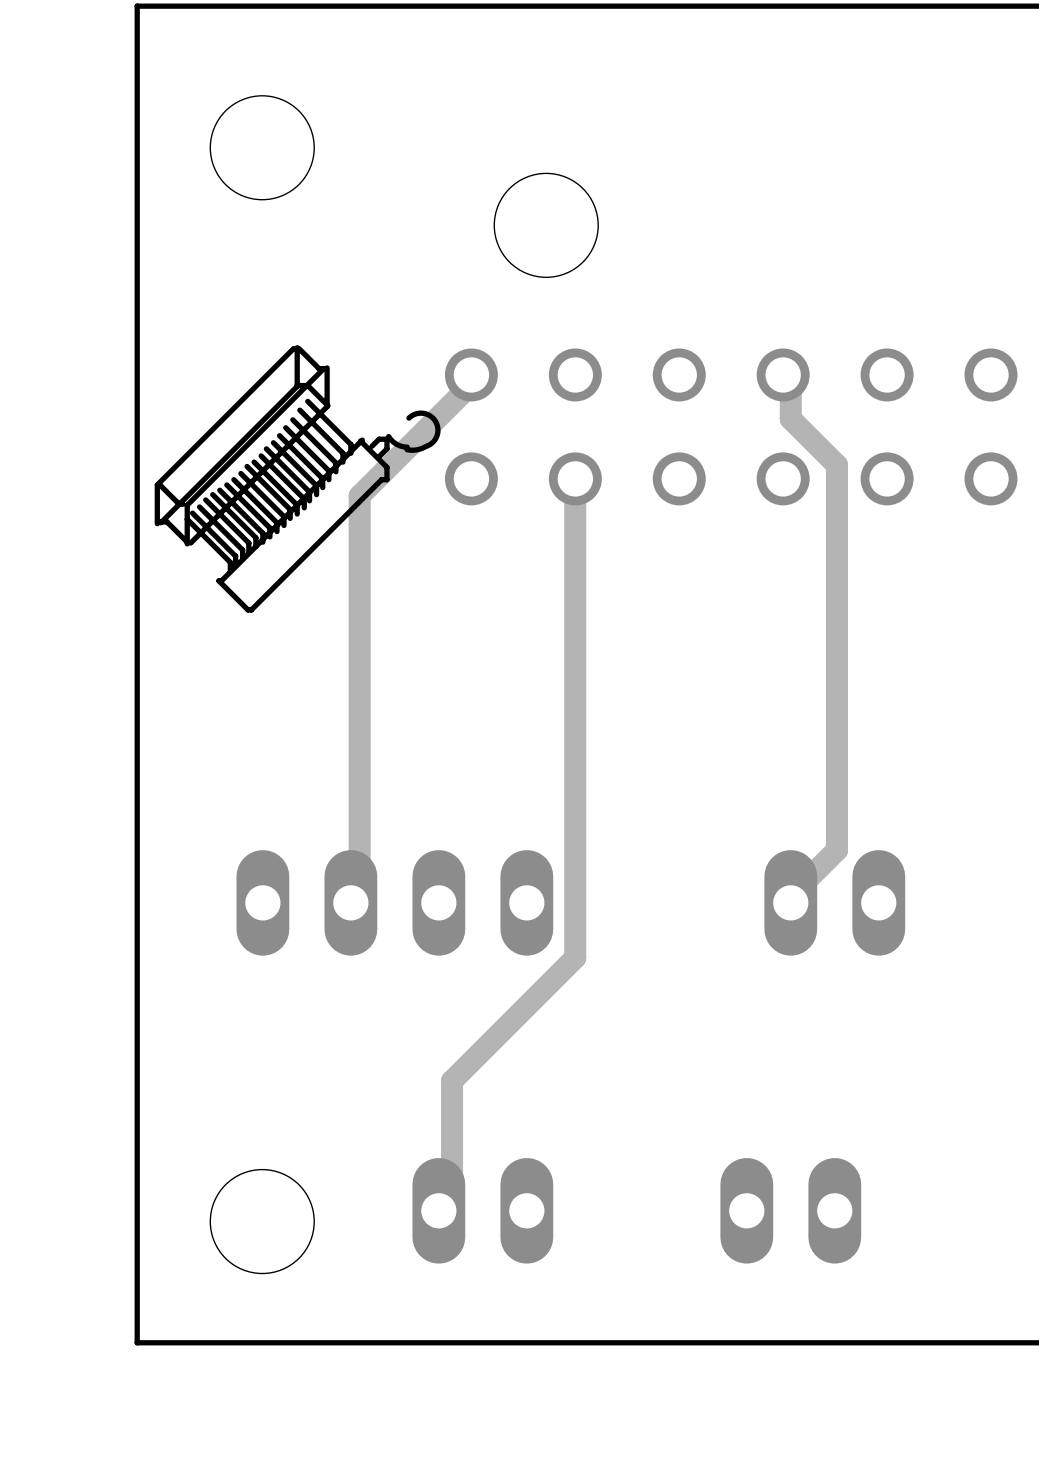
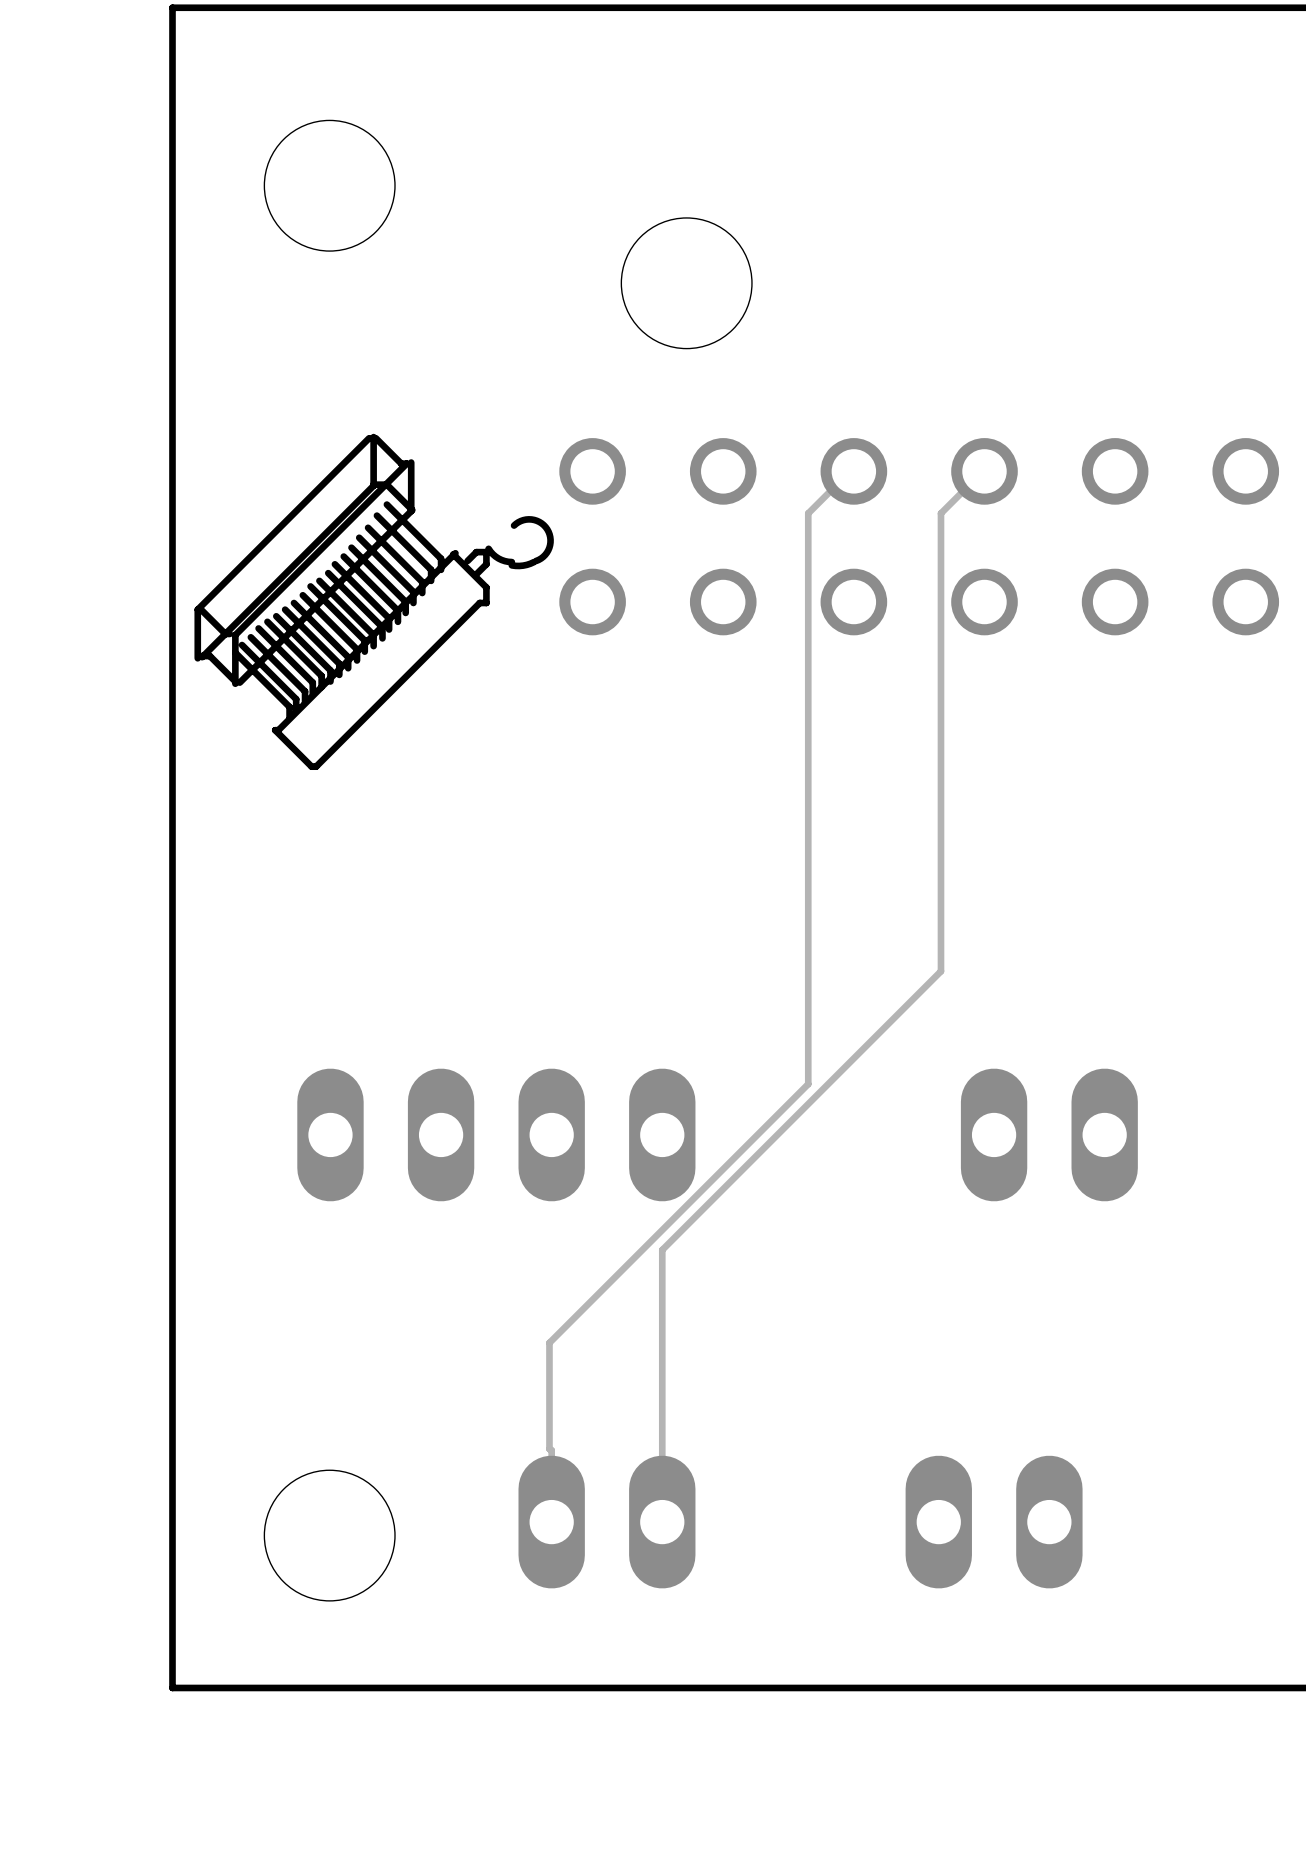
track: (471, 374) (467, 388) (359, 495) (359, 896) (350, 902) -> none
track: (783, 374) (790, 388) (790, 418) (836, 465) (836, 850) (790, 896) (790, 902) -> (984, 471) (940, 513) (940, 971) (662, 1250) (662, 1522)
track: (575, 478) (575, 957) (452, 1081) (452, 1204) (438, 1210) -> (853, 471) (848, 473) (808, 513) (808, 1084) (549, 1342) (551, 1522)

